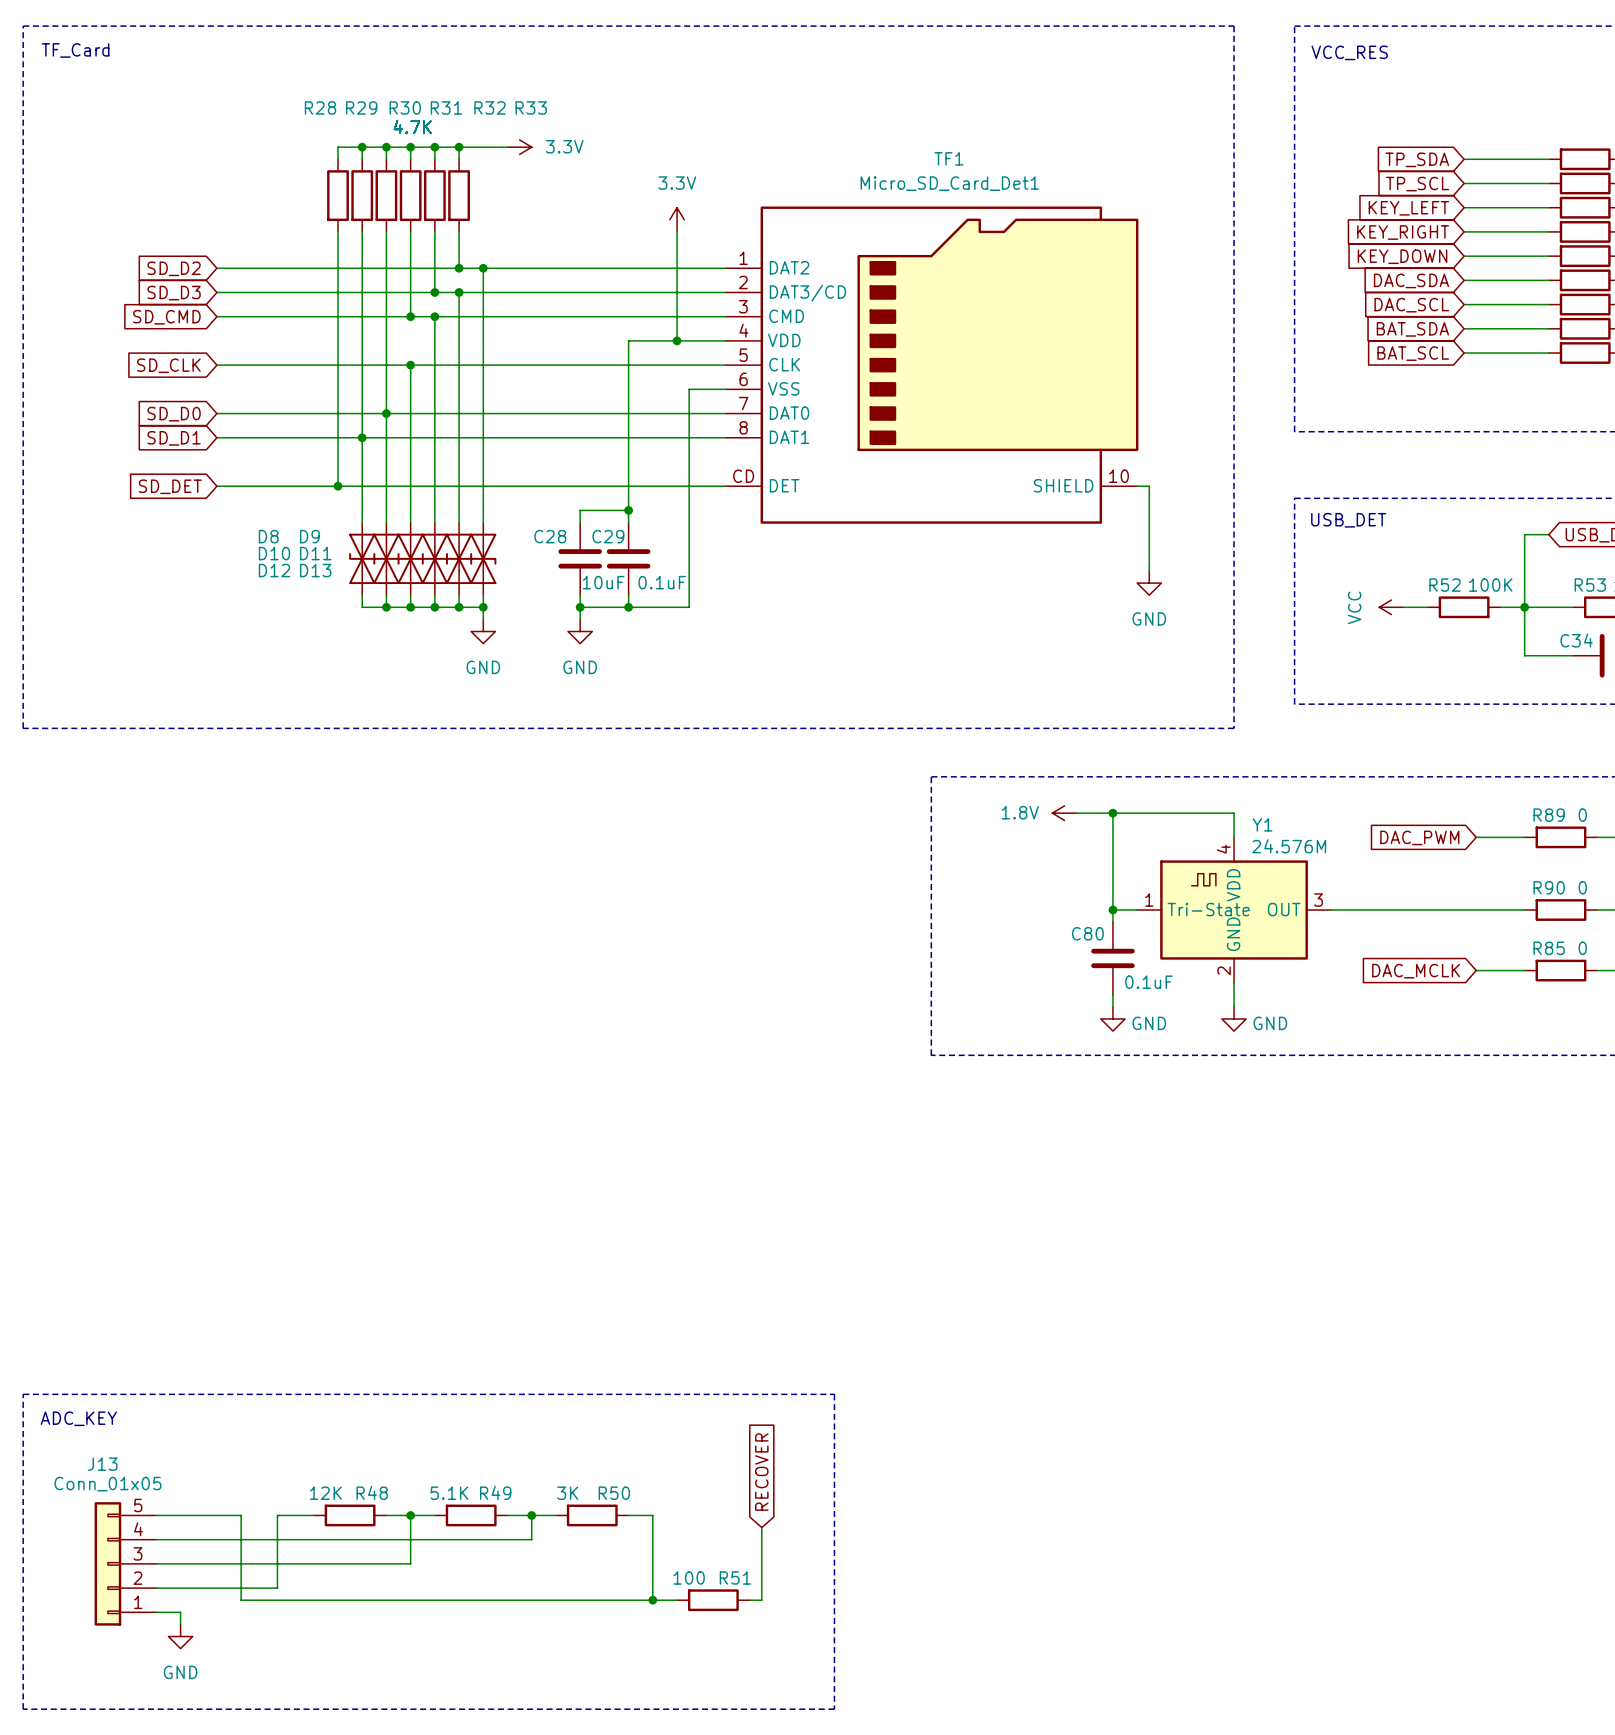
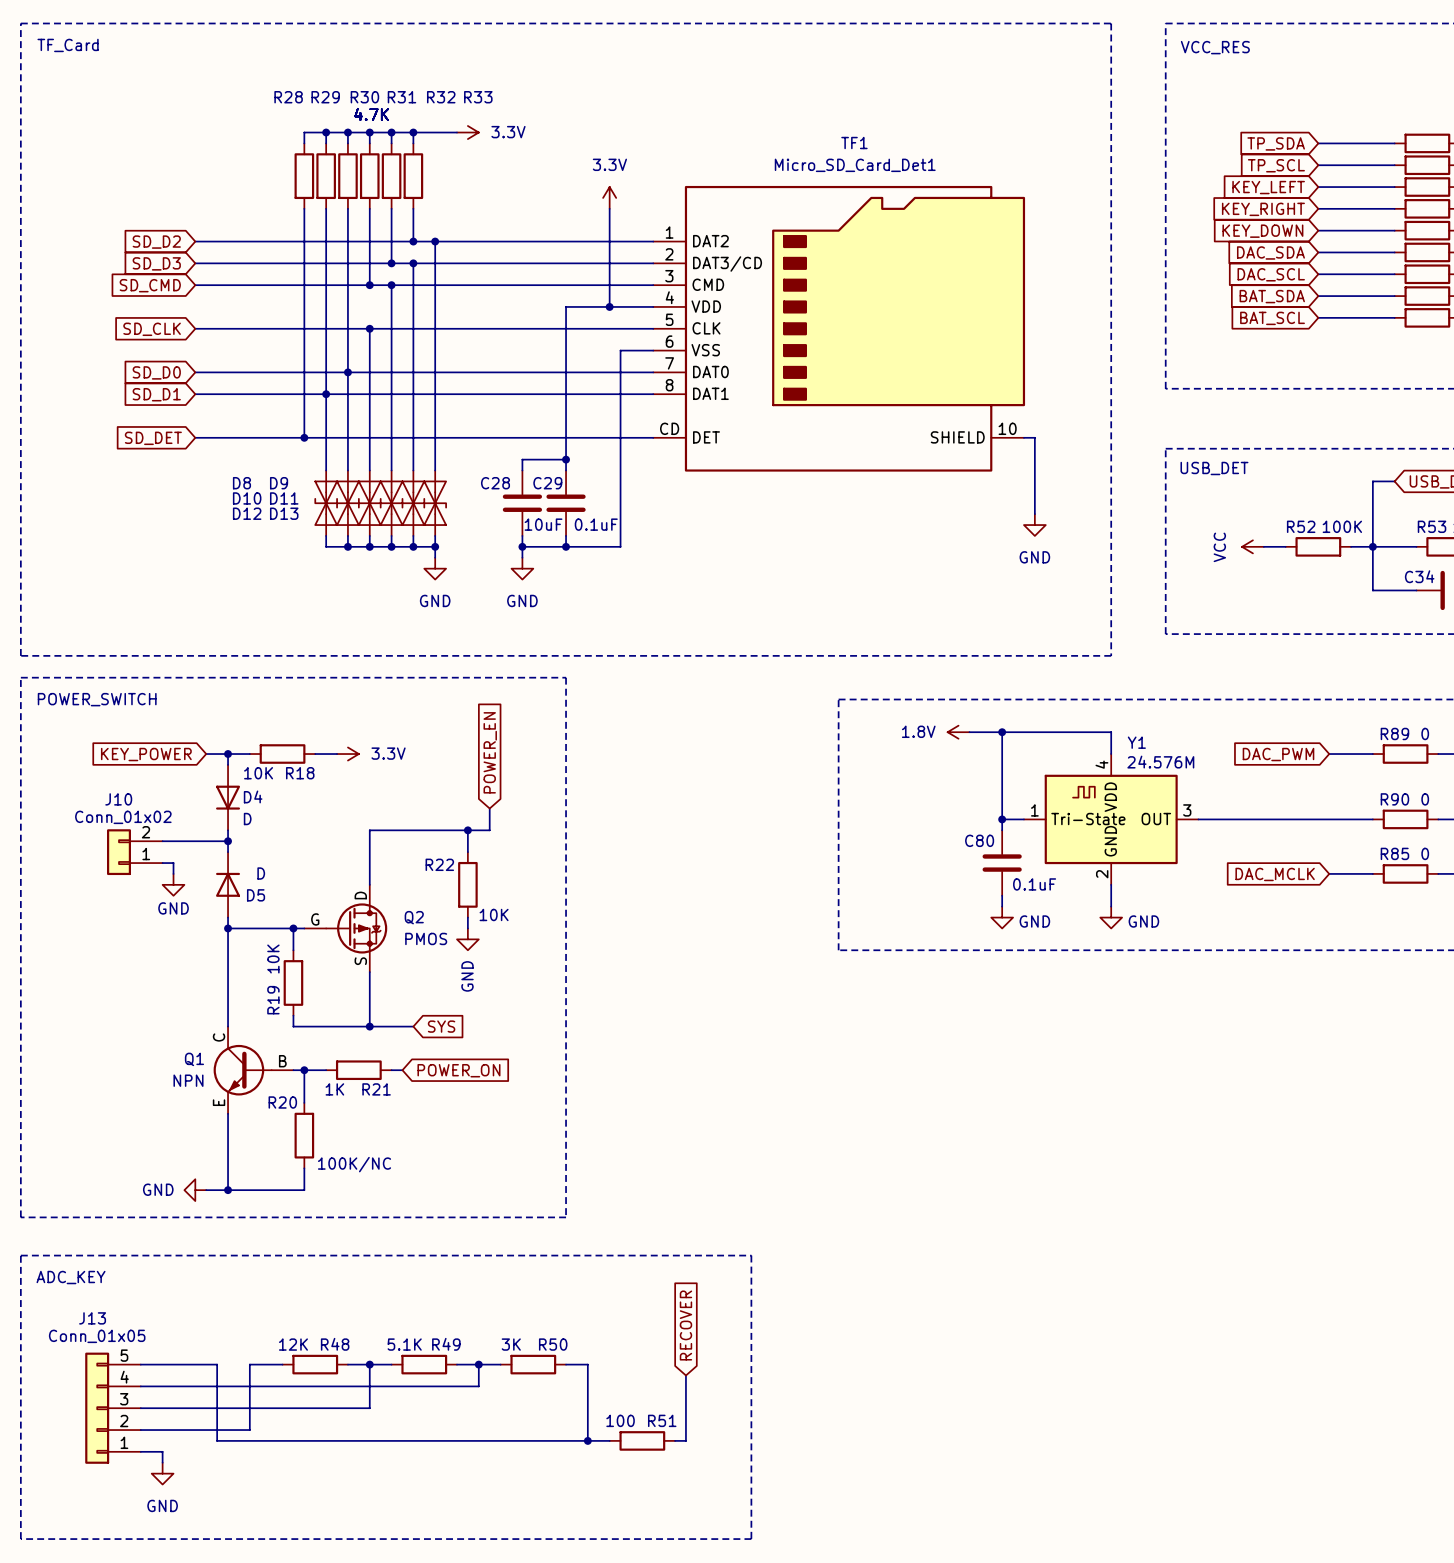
line: none -> (20, 677) (566, 677) (566, 1217) (20, 1217) (20, 677)
text: none -> POWER_SWITCH (97, 699)
global label: none -> POWER_EN (490, 752)
global label: none -> KEY_POWER (146, 754)
wire: none -> (206, 754) (249, 754)
wire: none -> (228, 754) (228, 764)
junction: none -> (228, 754)
R18: none -> 10K (282, 754)
wire: none -> (315, 754) (337, 754)
power symbol: none -> 3.3V (347, 754)
D4: none -> D (228, 797)
wire: none -> (489, 808) (489, 830) (369, 830) (369, 884)
wire: none -> (228, 830) (228, 852)
wire: none -> (467, 830) (467, 852)
junction: none -> (467, 830)
wire: none -> (162, 841) (228, 841)
junction: none -> (228, 841)
J10: none -> Conn_01x02 (134, 852)
wire: none -> (162, 863) (173, 863) (173, 873)
power symbol: none -> GND (173, 884)
D5: none -> D (228, 884)
R22: none -> 10K (467, 884)
wire: none -> (228, 917) (228, 1026)
wire: none -> (467, 917) (467, 928)
wire: none -> (228, 928) (304, 928)
junction: none -> (228, 928)
wire: none -> (293, 928) (293, 950)
junction: none -> (293, 928)
Q2: none -> PMOS (345, 928)
power symbol: none -> GND (467, 939)
wire: none -> (369, 972) (369, 1026)
R19: none -> 10K (293, 982)
wire: none -> (293, 1015) (293, 1026) (413, 1026)
junction: none -> (369, 1026)
global label: none -> SYS (441, 1026)
Q1: none -> NPN (253, 1070)
wire: none -> (293, 1070) (326, 1070)
wire: none -> (304, 1070) (304, 1102)
junction: none -> (304, 1070)
R21: none -> 1K (358, 1070)
wire: none -> (391, 1070) (402, 1070)
global label: none -> POWER_ON (458, 1070)
wire: none -> (228, 1113) (228, 1190)
R20: none -> 100K/NC (304, 1135)
wire: none -> (304, 1168) (304, 1190) (206, 1190)
power symbol: none -> GND (195, 1190)
junction: none -> (228, 1190)

